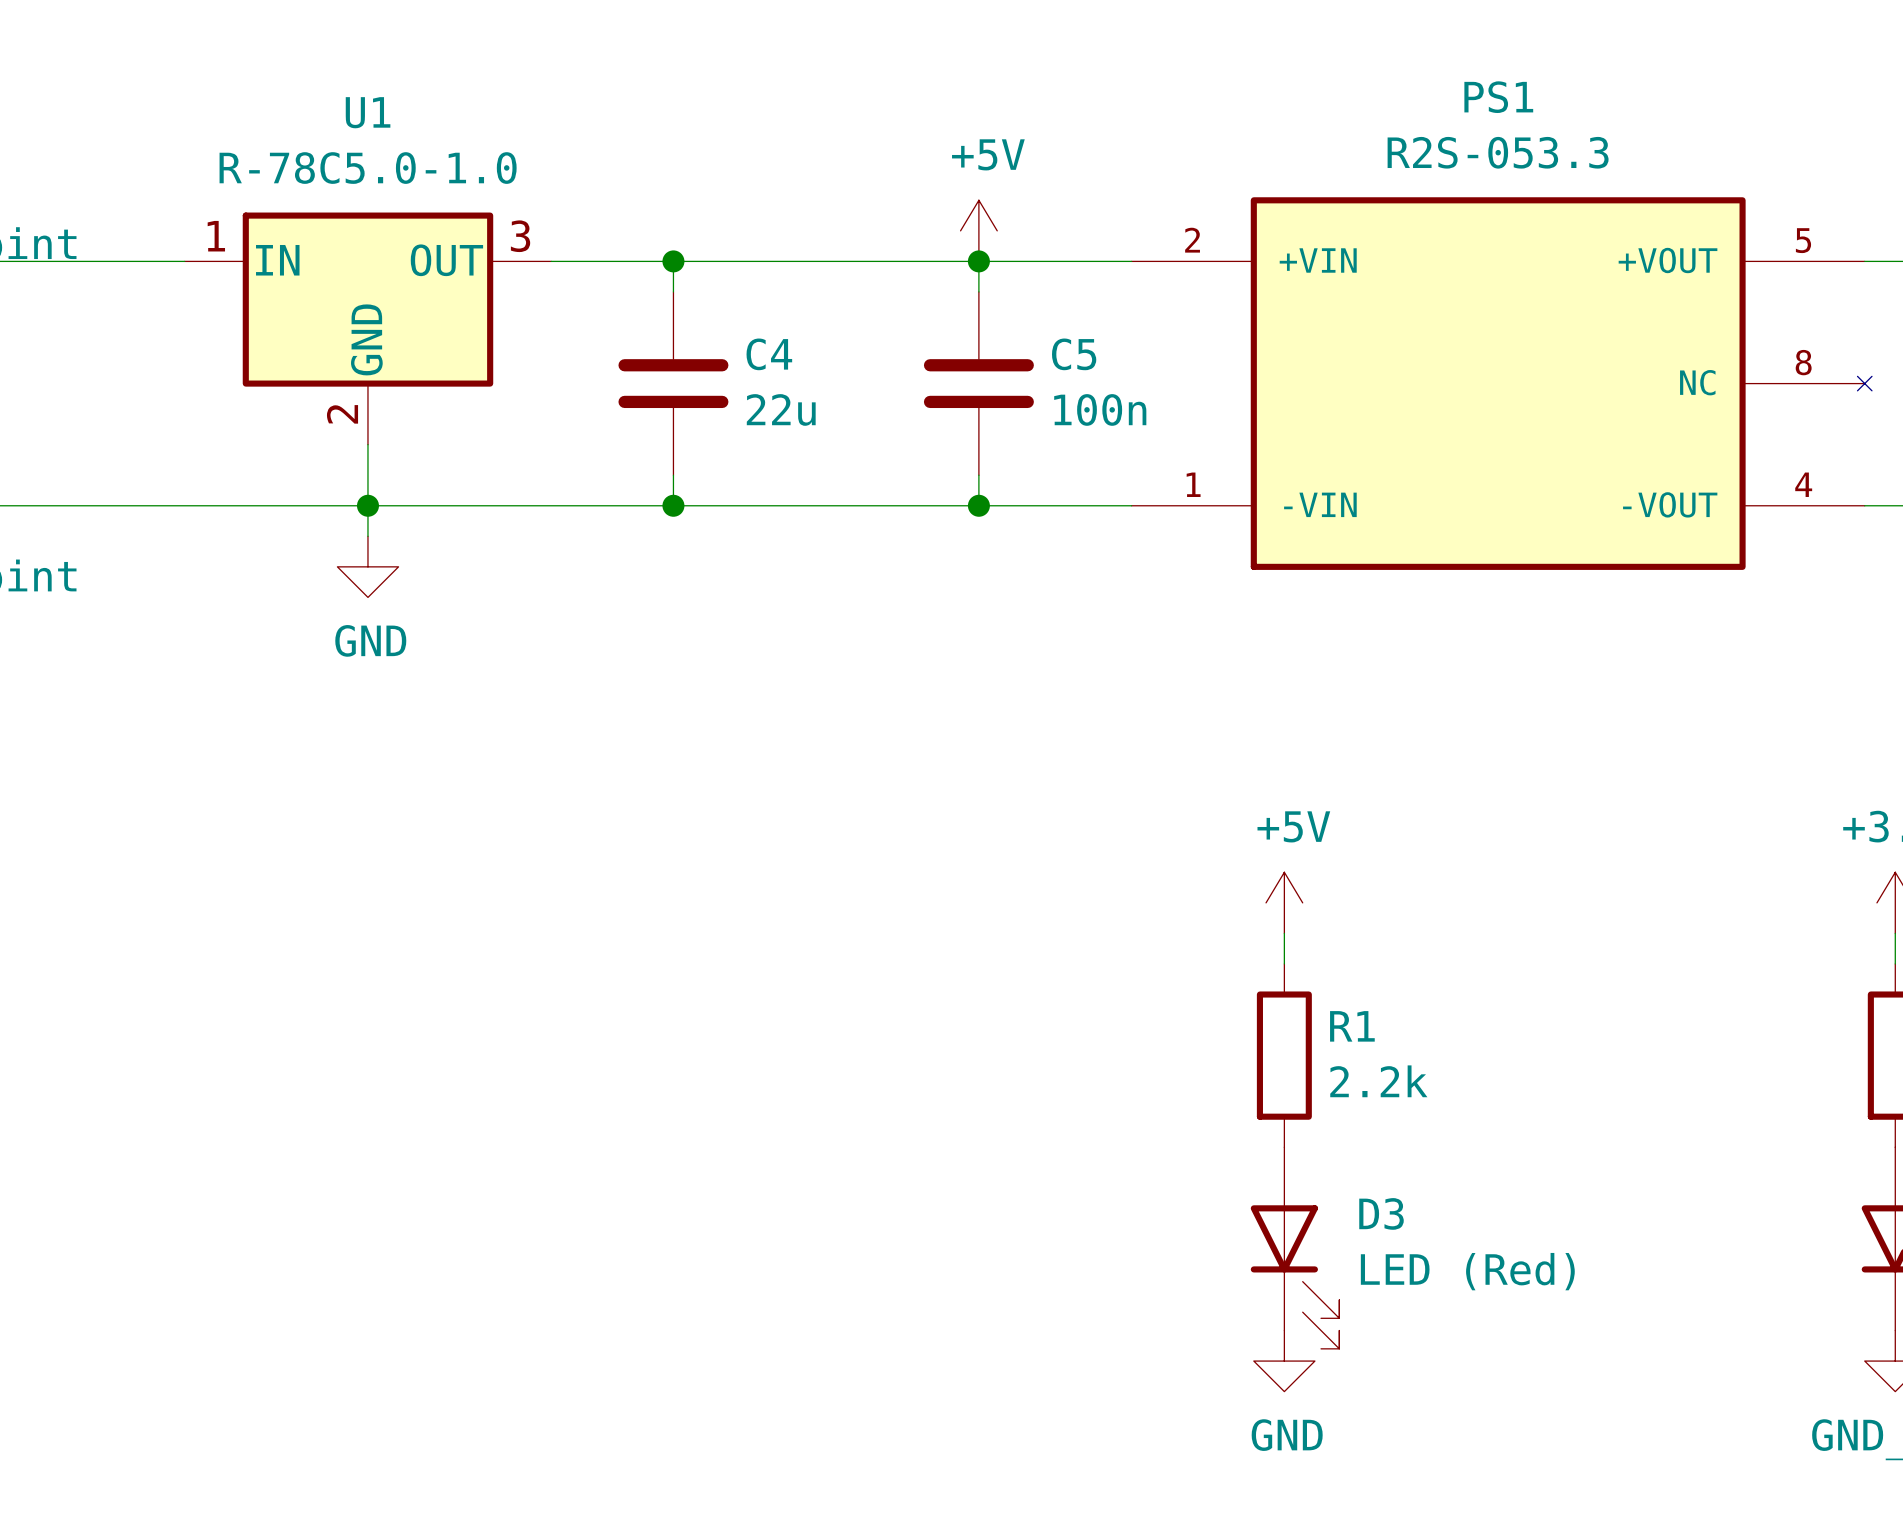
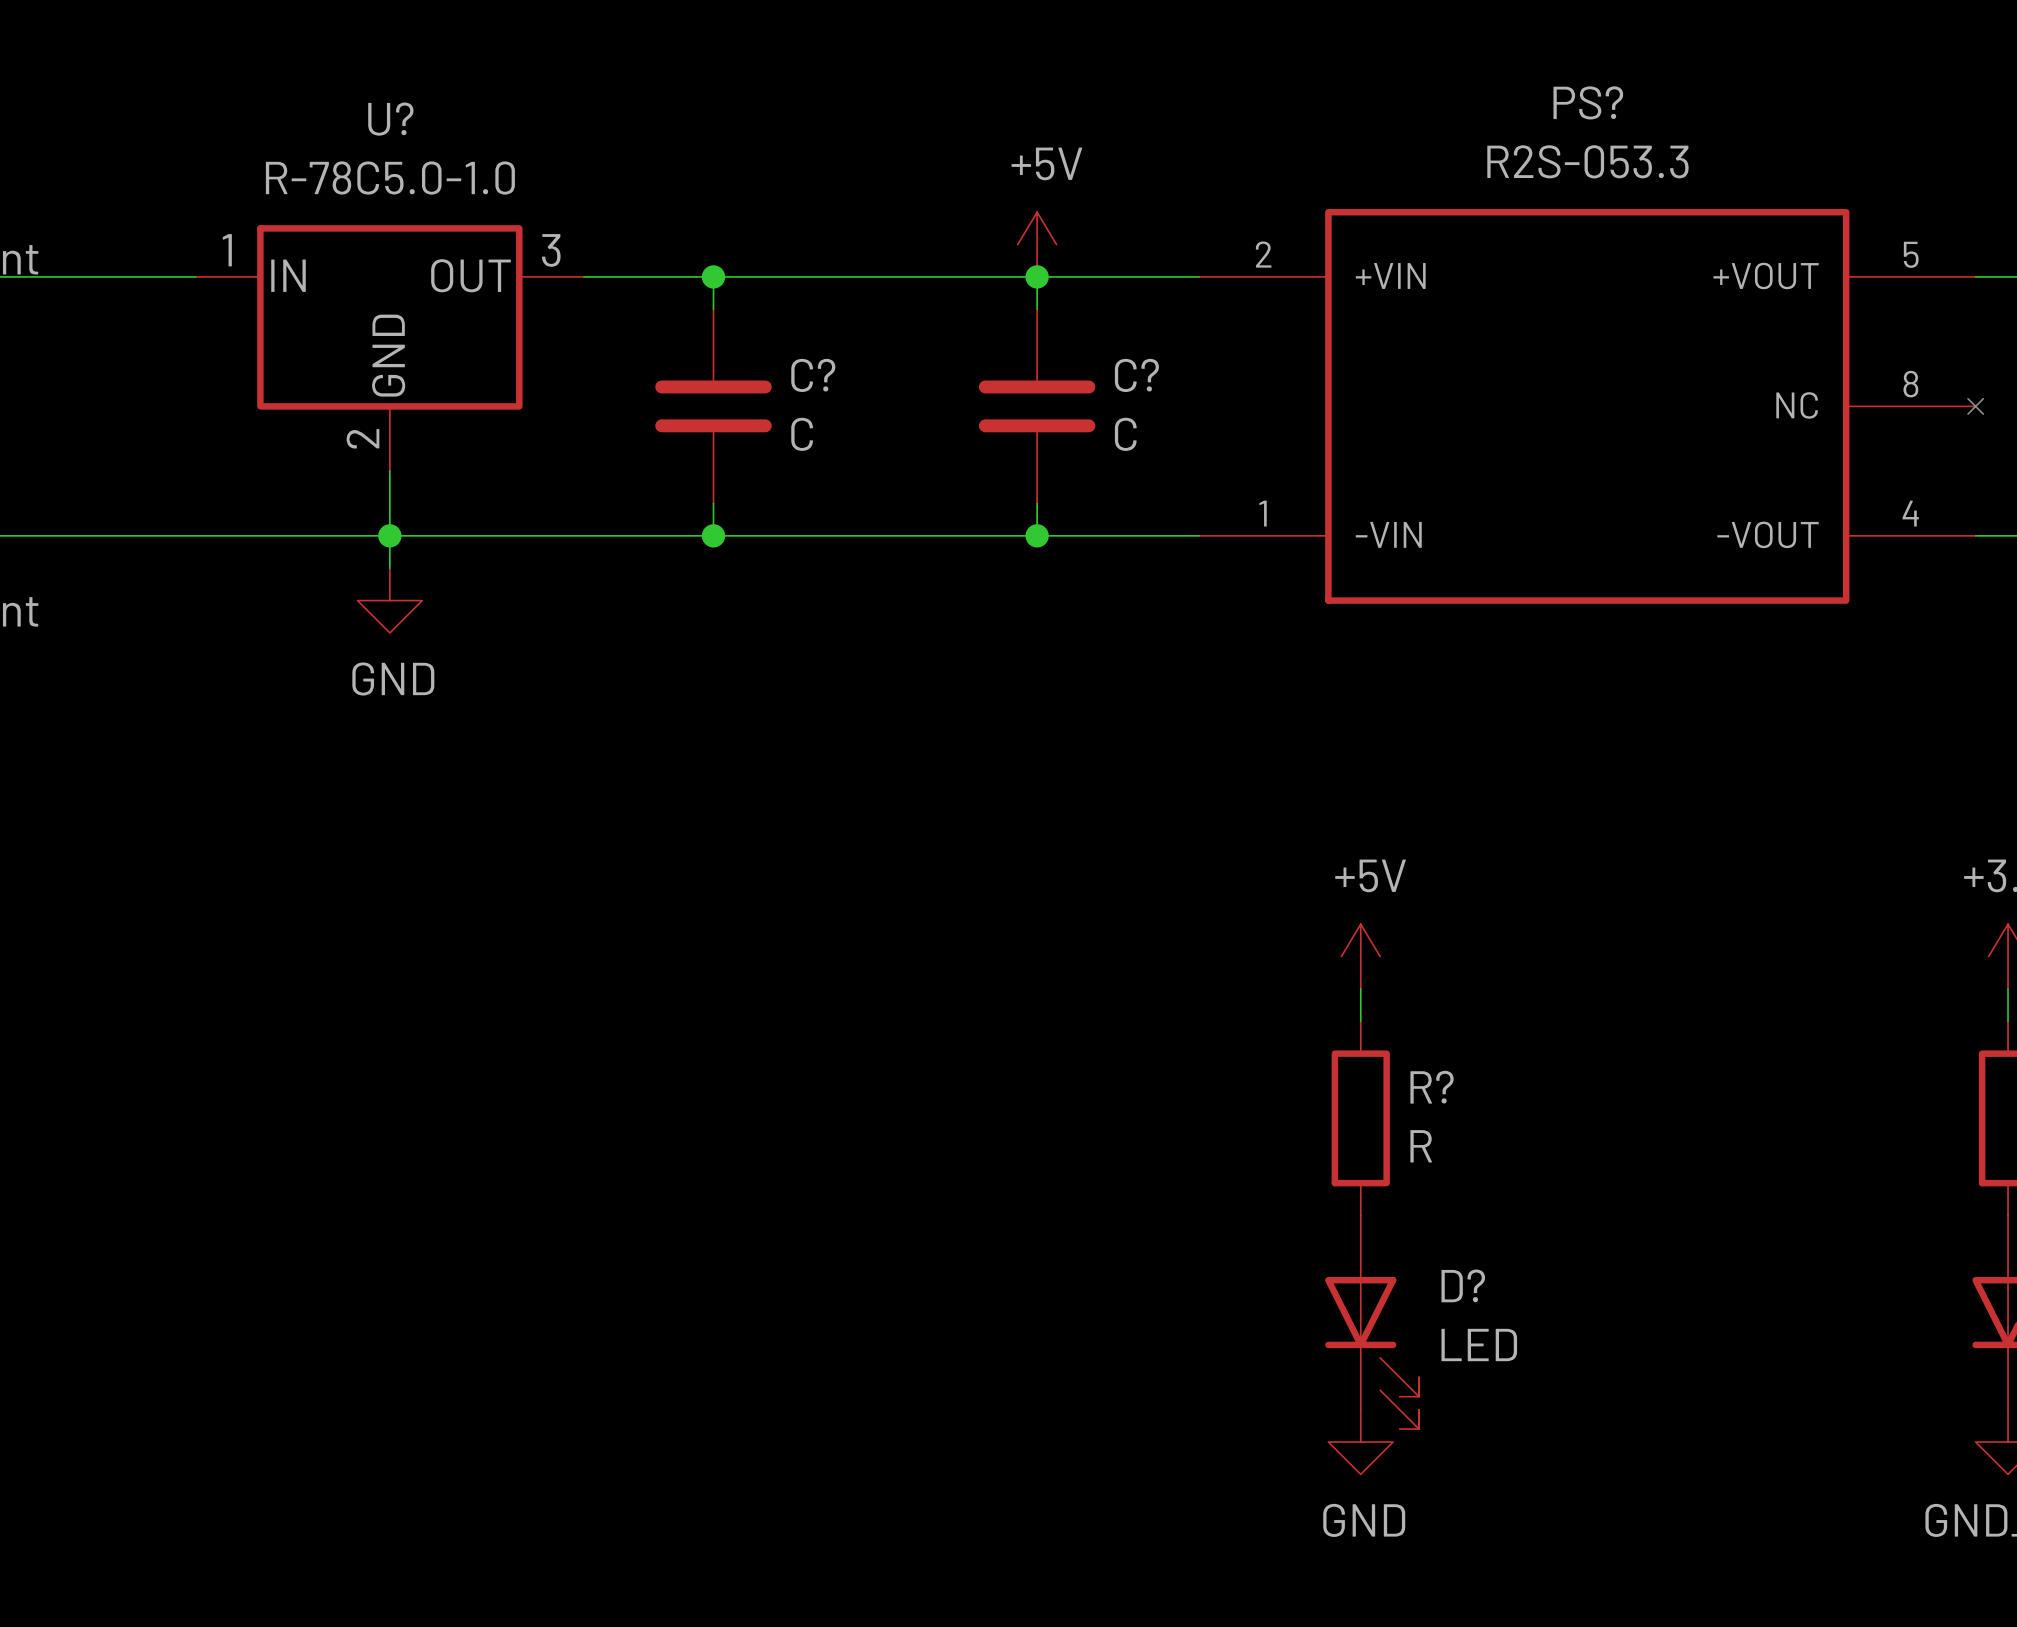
PS1 name: PS1 (1498, 97) -> PS? (1588, 102)
U1 name: U1 (368, 112) -> U? (390, 119)
C4 name: C4 (769, 354) -> C? (813, 375)
C5 name: C5 (1074, 354) -> C? (1136, 375)
C4 value: 22u (781, 409) -> C (802, 434)
C5 value: 100n (1100, 409) -> C (1125, 434)
R1 name: R1 (1352, 1026) -> R? (1432, 1087)
R1 value: 2.2k (1378, 1081) -> R (1421, 1146)
D3 name: D3 (1381, 1213) -> D? (1463, 1285)
D3 value: LED (Red) (1467, 1271) -> LED (1479, 1345)

